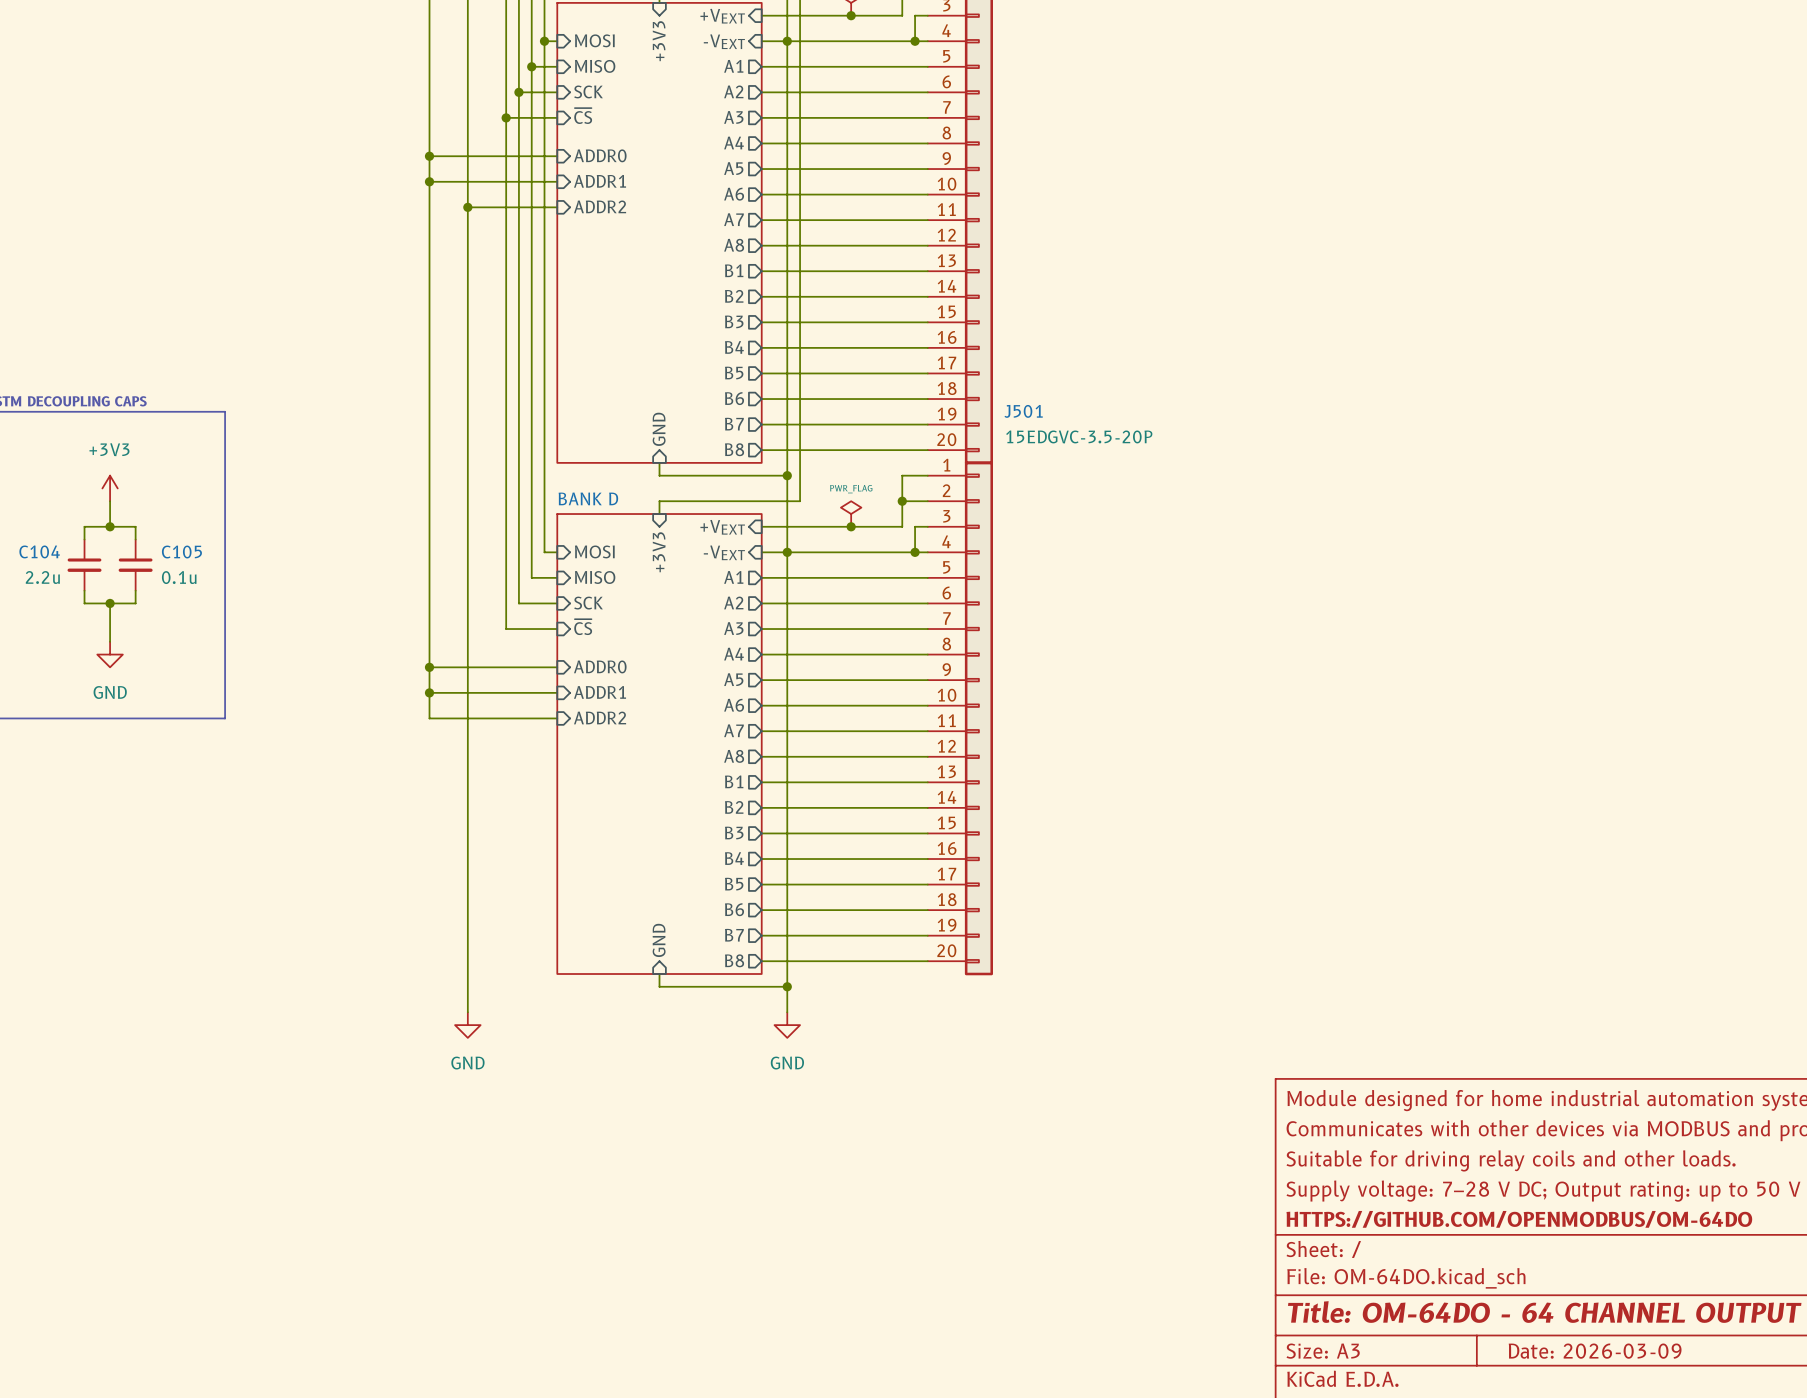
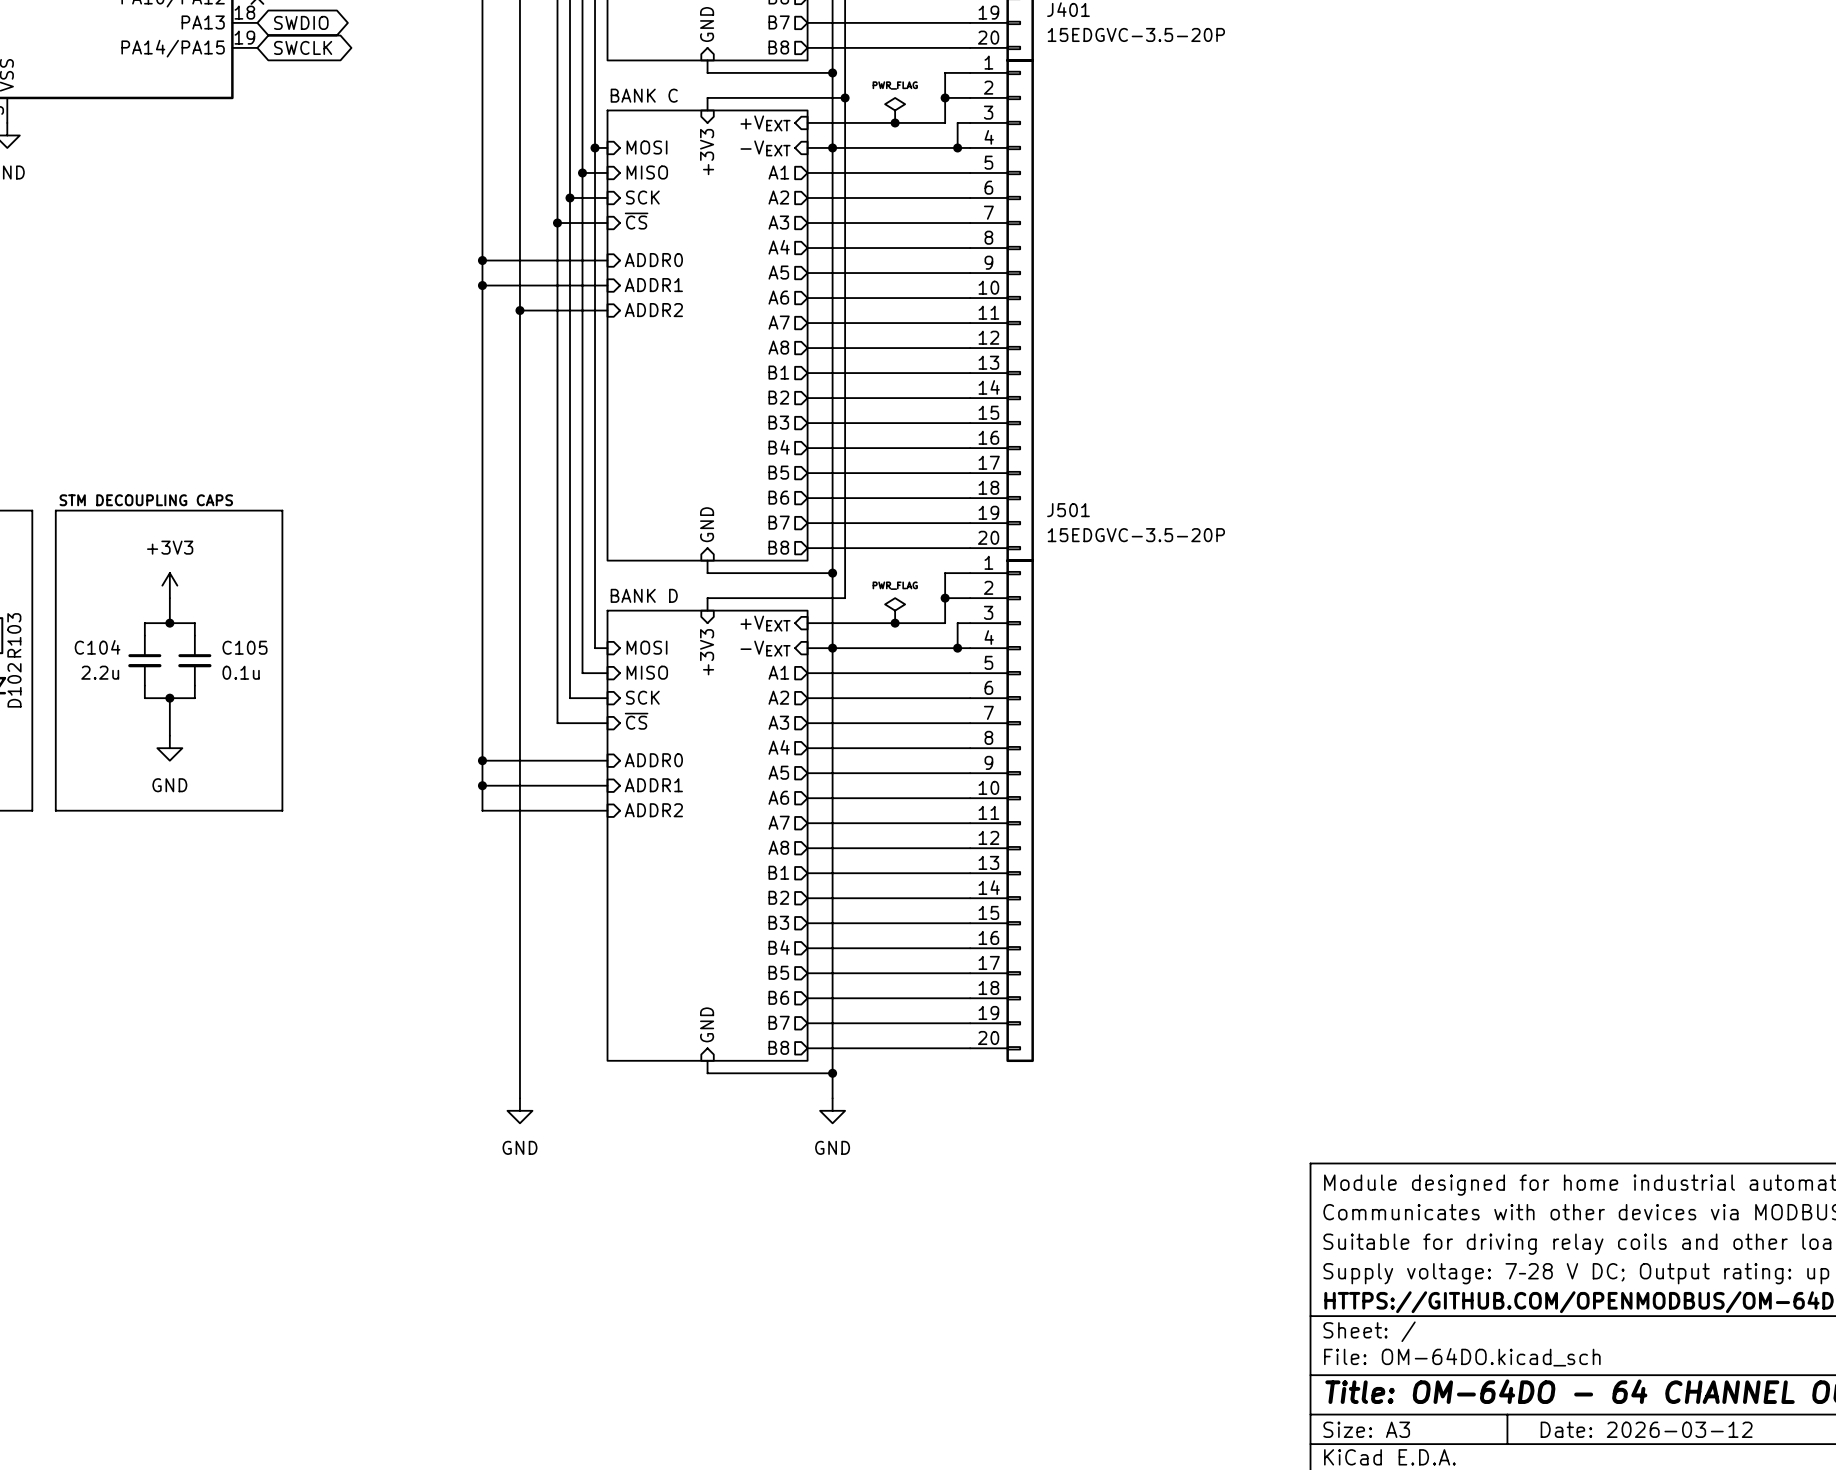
title block: Date: 2026-03-09 (1595, 1351) -> Date: 2026-03-12 (1646, 1429)

